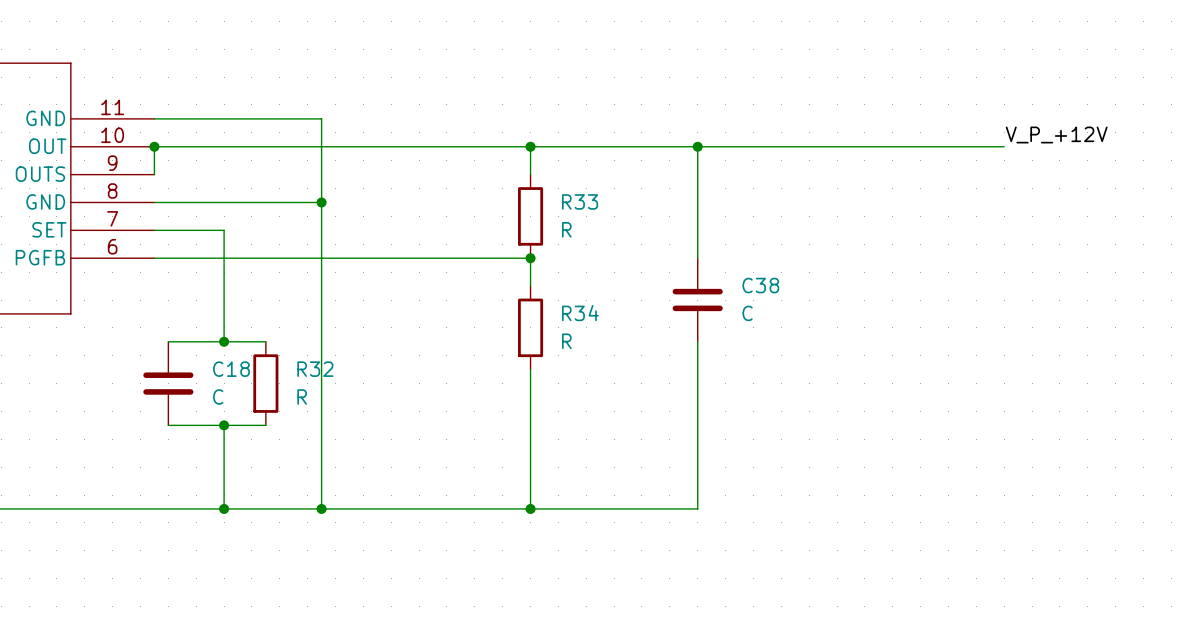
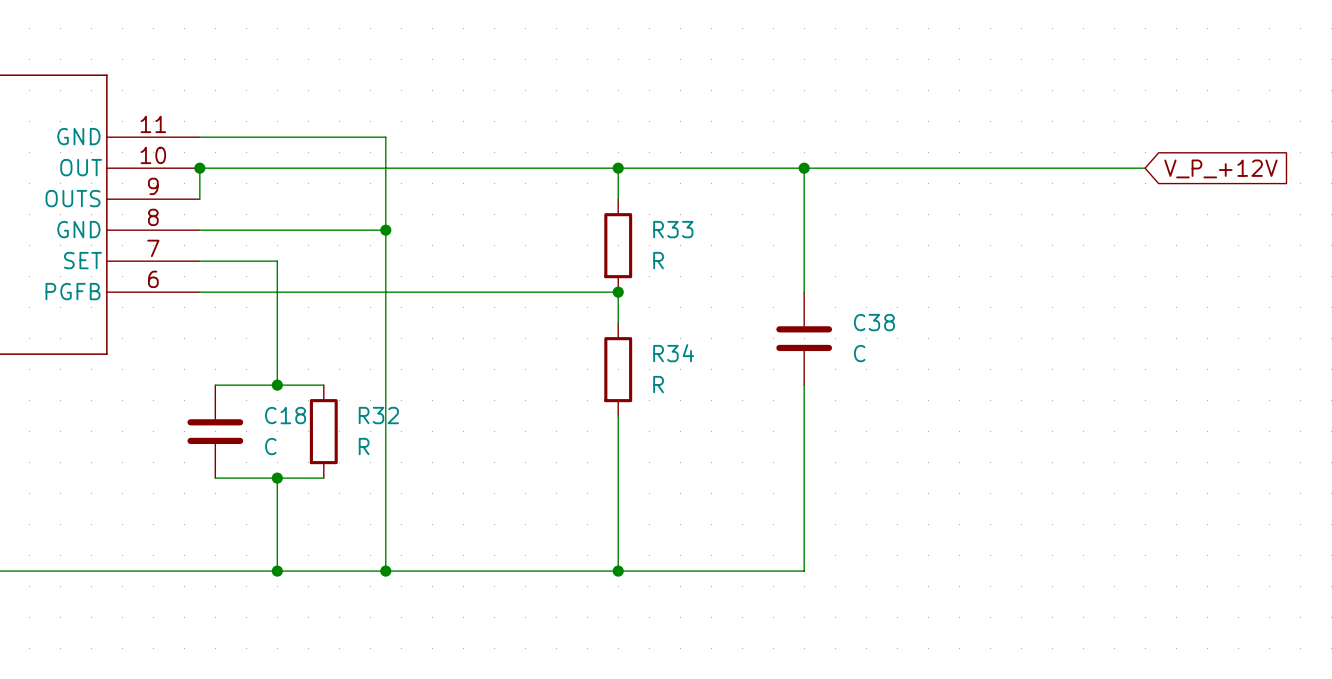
label: V_P_+12V (1056, 135) -> none
global label: none -> V_P_+12V (1220, 168)

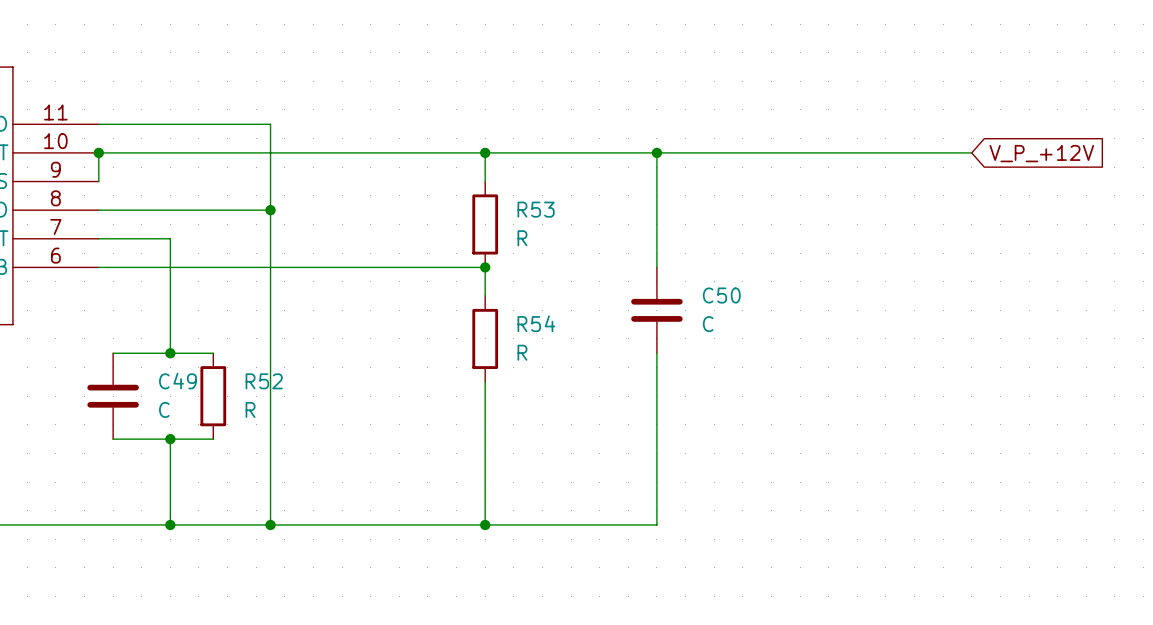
R33 name: R33 (673, 229) -> R53 (536, 209)
C38 name: C38 (874, 322) -> C50 (721, 295)
R34 name: R34 (673, 353) -> R54 (536, 323)
C18 name: C18 (285, 415) -> C49 (177, 381)
R32 name: R32 (378, 415) -> R52 (264, 381)

